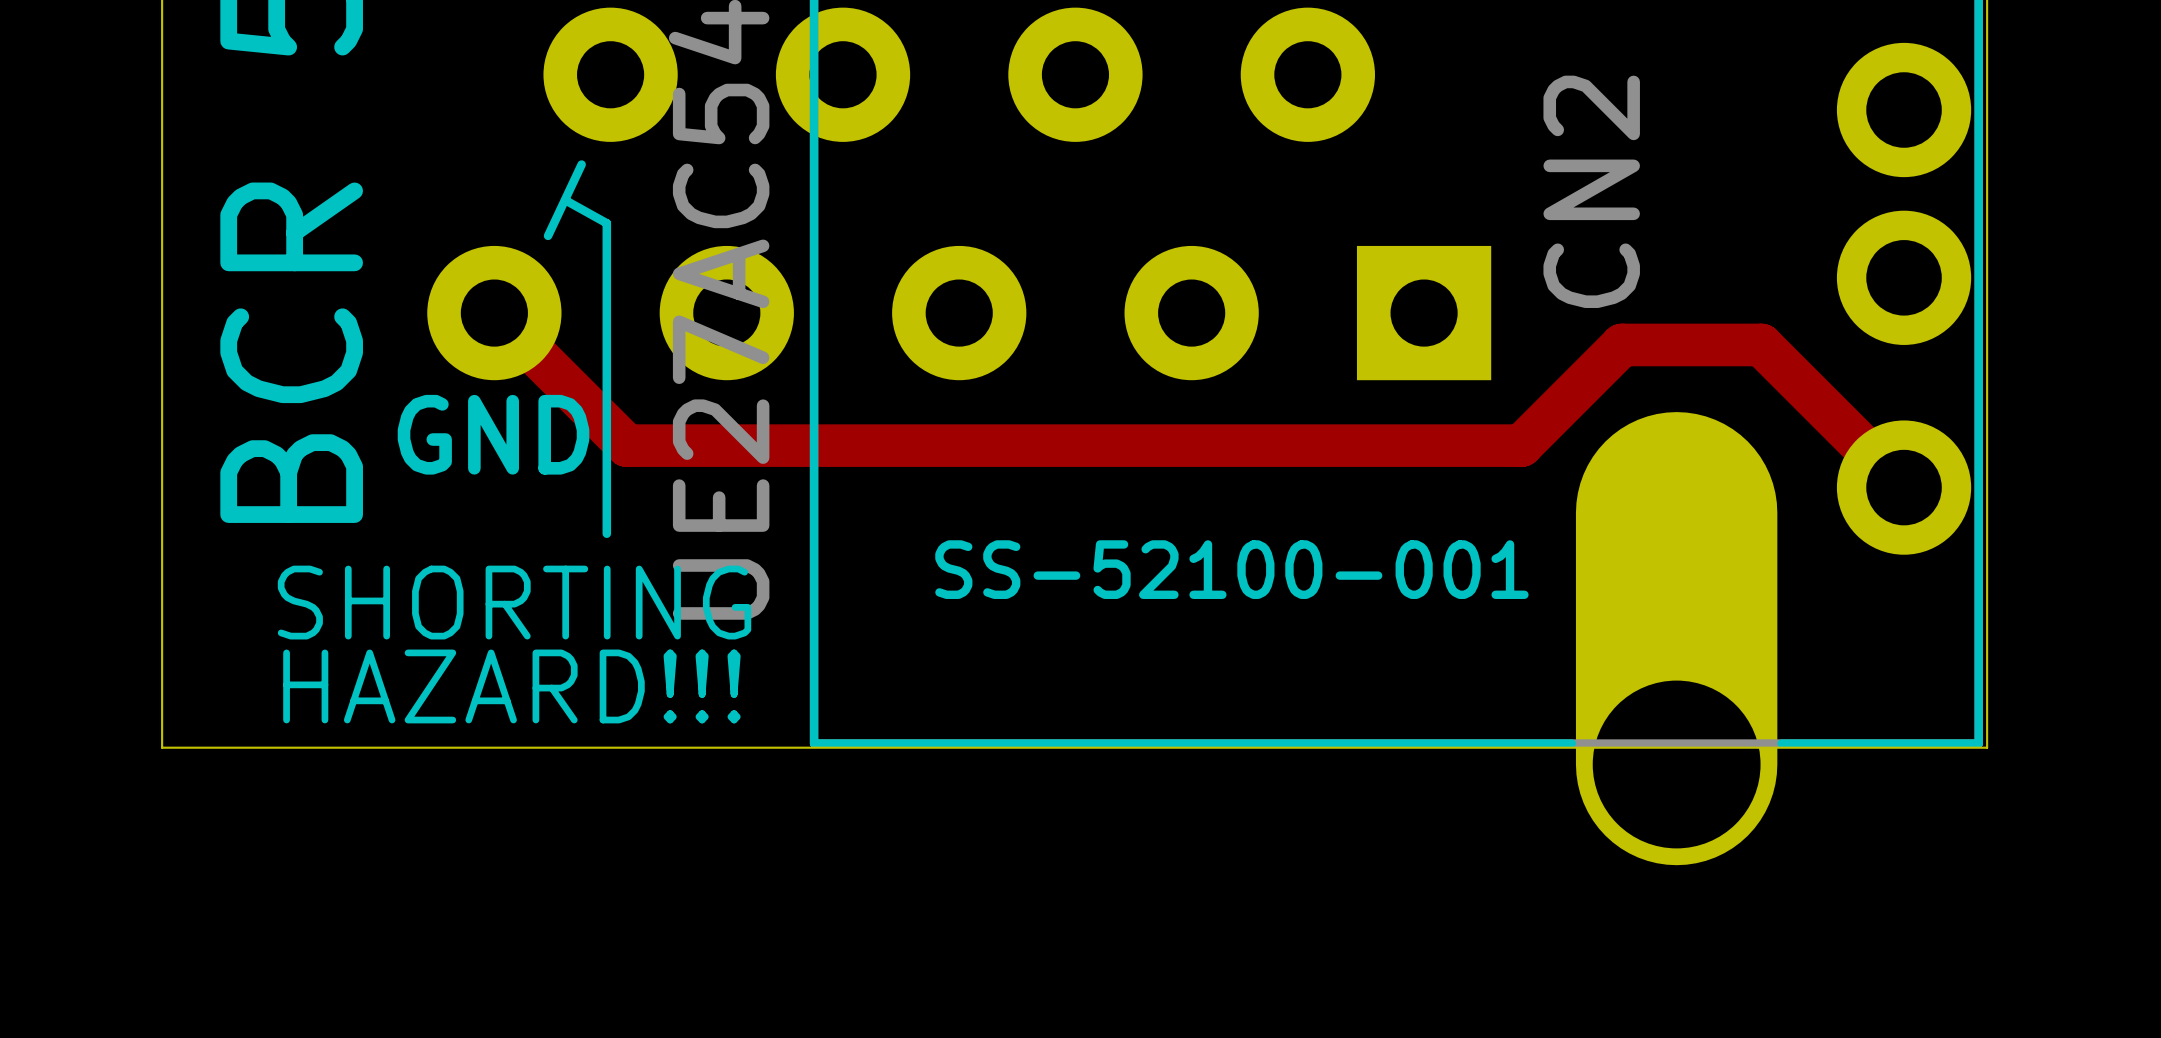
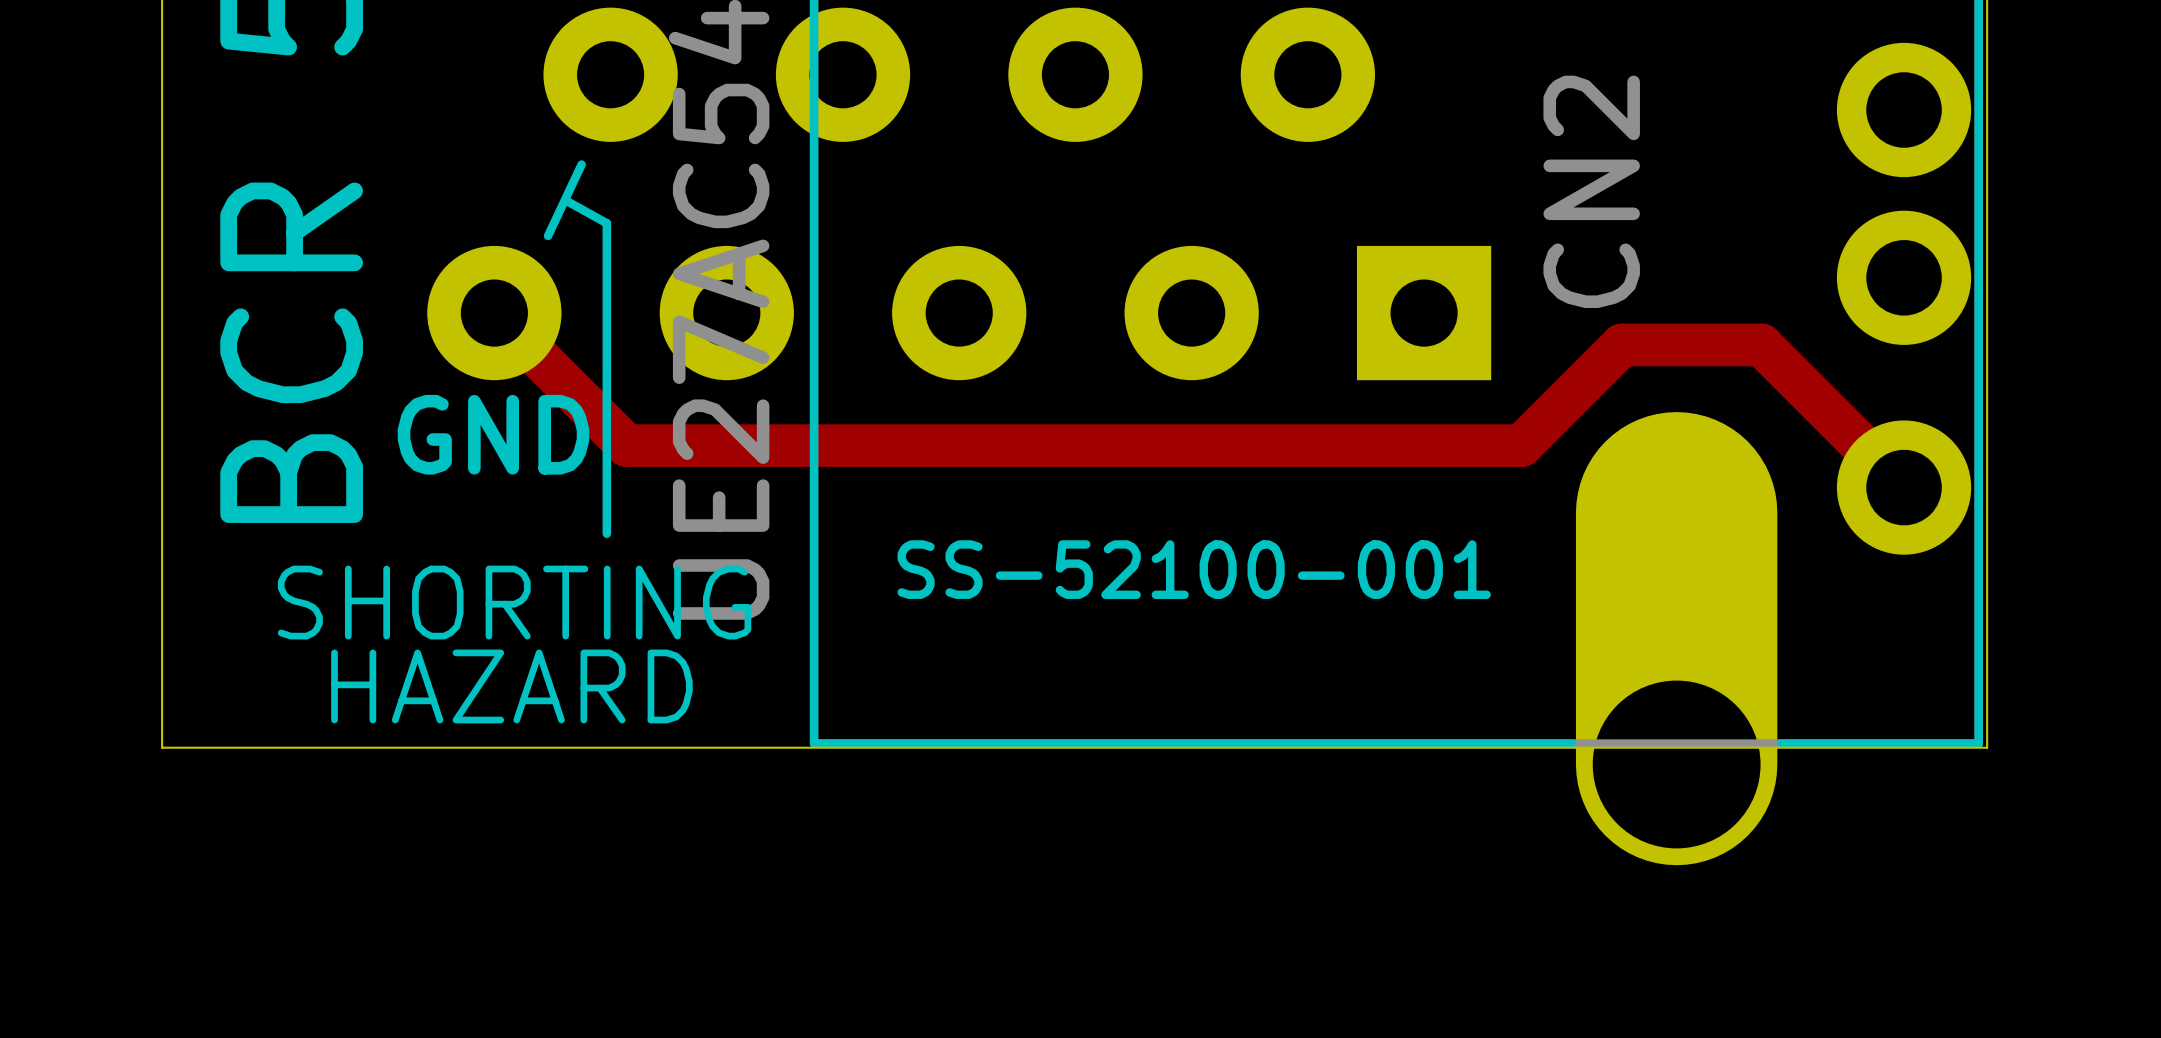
text position: SS-52100-001 (1231, 569) -> SS-52100-001 (1194, 569)
text: HAZARD!!! (511, 686) -> HAZARD (511, 686)

